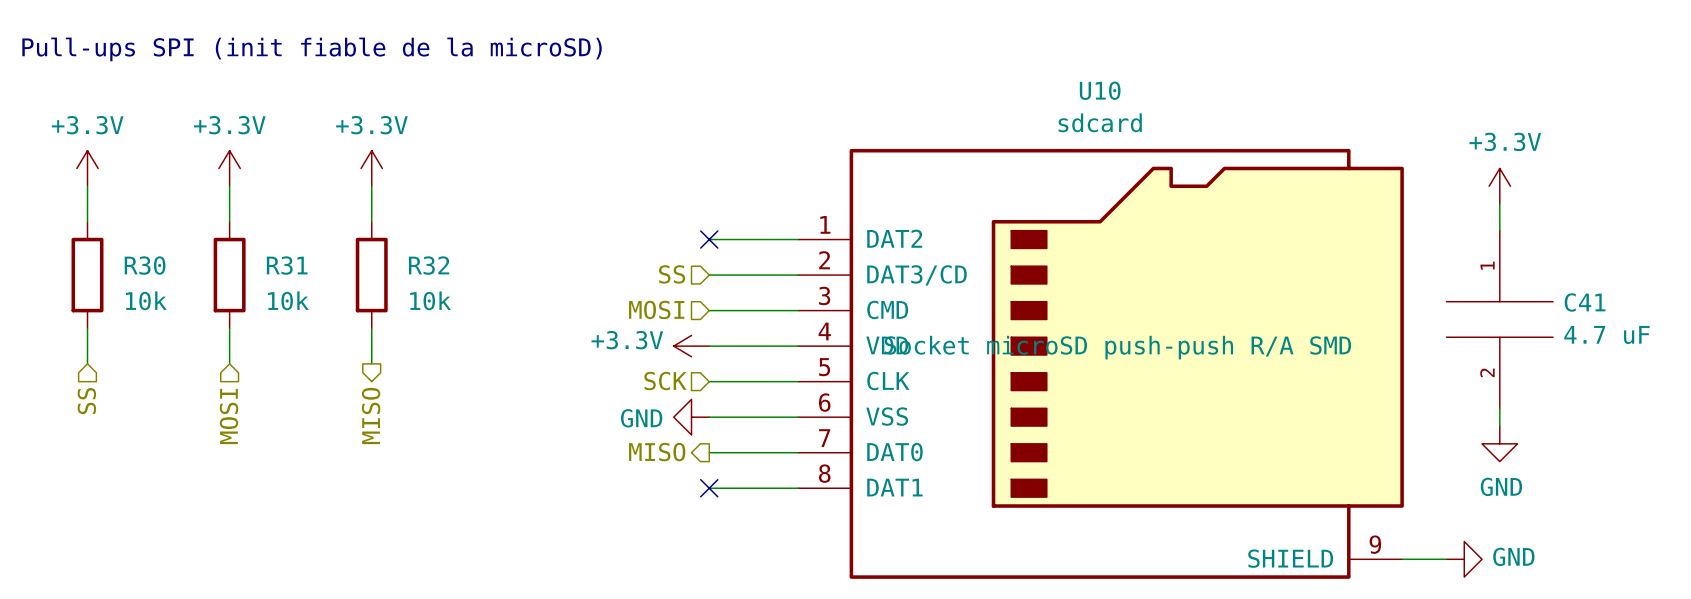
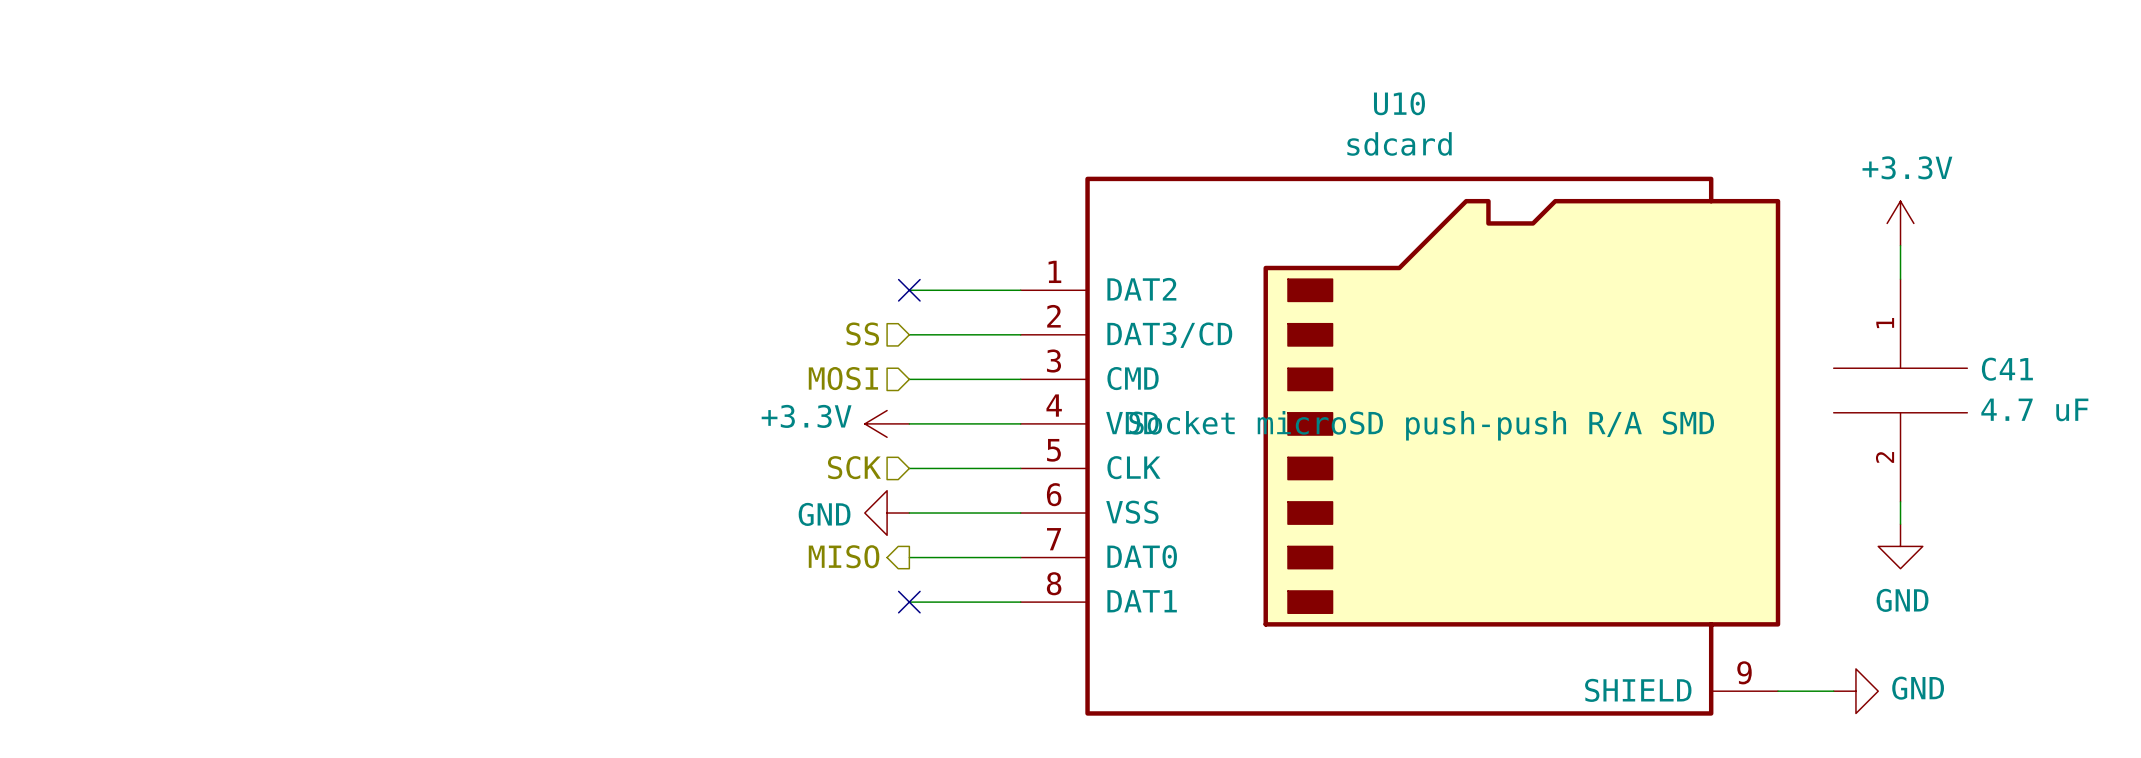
text: Pull-ups SPI (init fiable de la microSD) (312, 49) -> none
power symbol: +3.3V (87, 168) -> none
power symbol: +3.3V (229, 168) -> none
power symbol: +3.3V (371, 168) -> none
wire: (87, 186) (87, 221) -> none
wire: (229, 186) (229, 221) -> none
wire: (371, 186) (371, 221) -> none
R30: 10k (87, 275) -> none
R31: 10k (229, 275) -> none
R32: 10k (371, 275) -> none
wire: (87, 328) (87, 363) -> none
wire: (229, 328) (229, 363) -> none
wire: (371, 328) (371, 363) -> none
hierarchical label: SS (86, 401) -> none
hierarchical label: MISO (371, 415) -> none
hierarchical label: MOSI (228, 416) -> none

